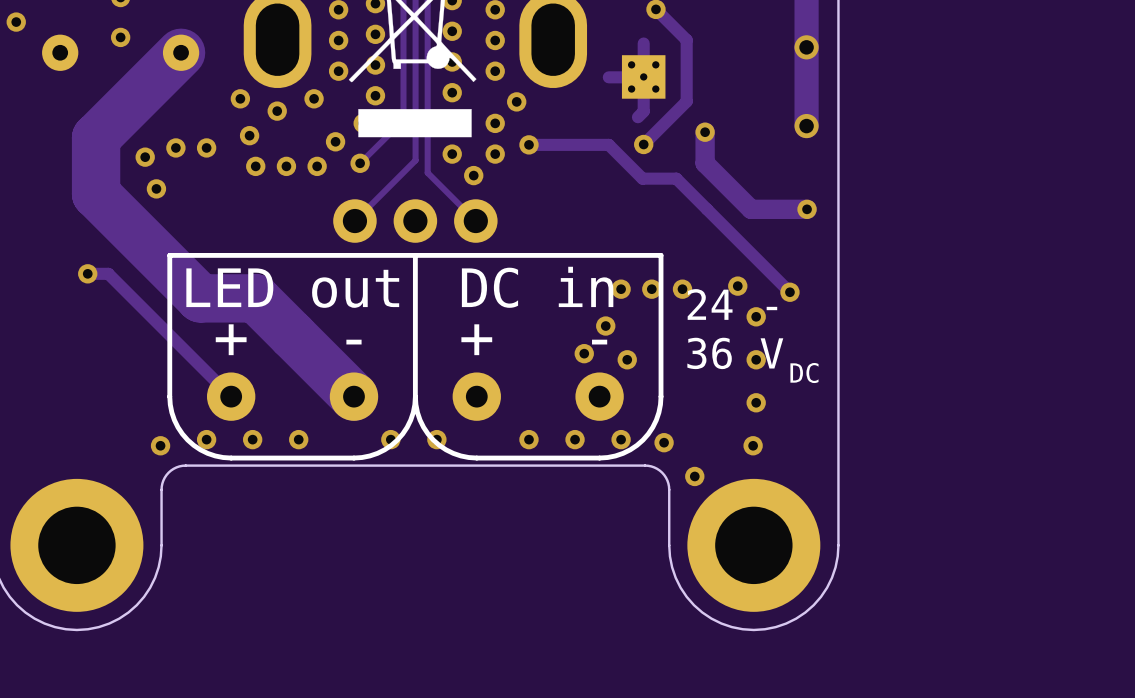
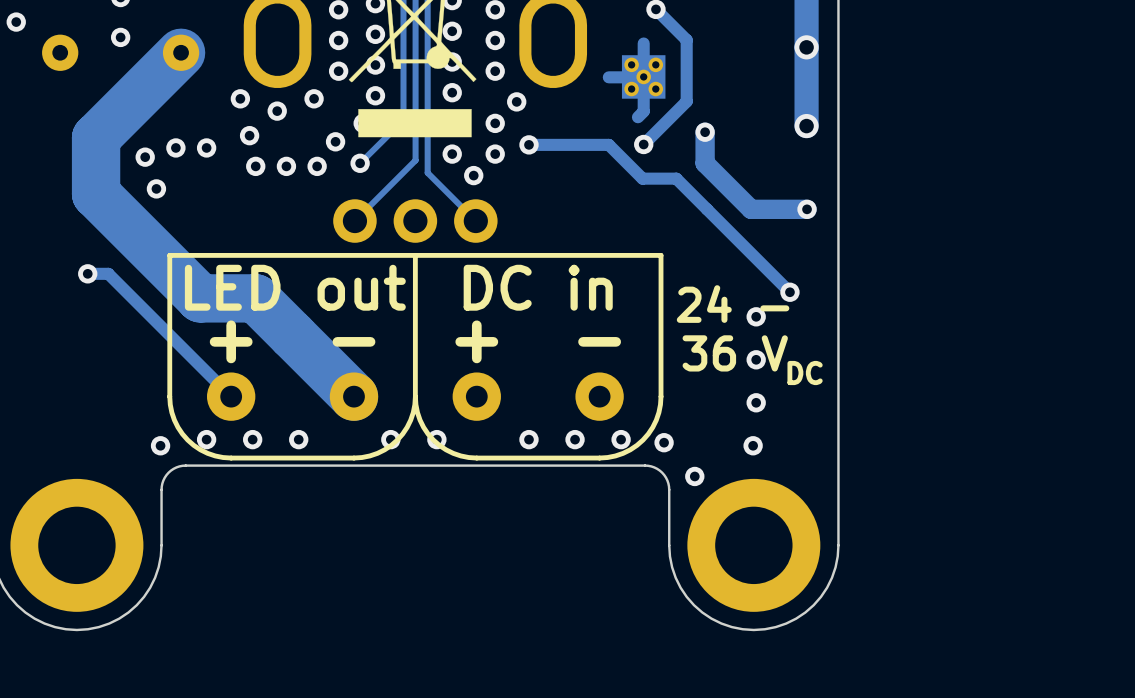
via: (737, 286) -> none
via: (621, 289) -> none
via: (651, 289) -> none
via: (682, 289) -> none
via: (605, 326) -> none
via: (584, 353) -> none
via: (627, 359) -> none

